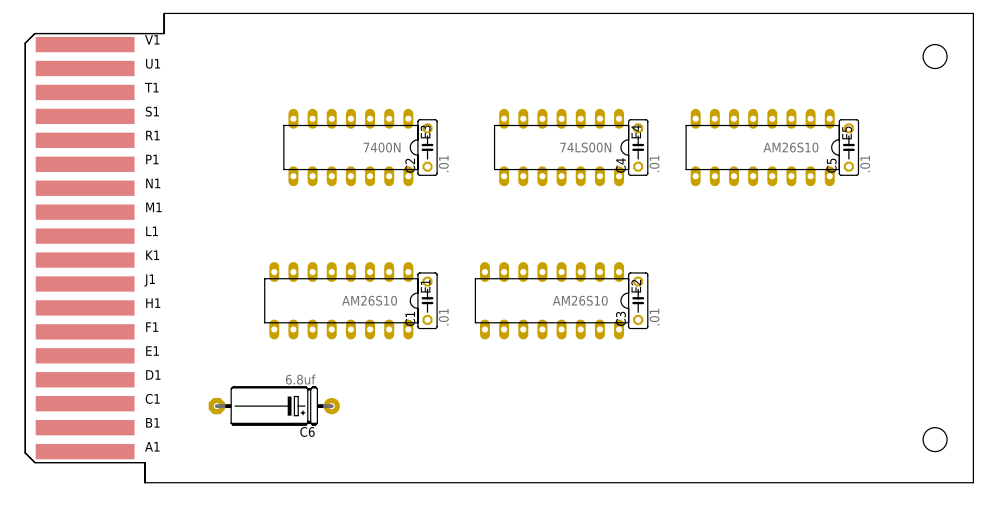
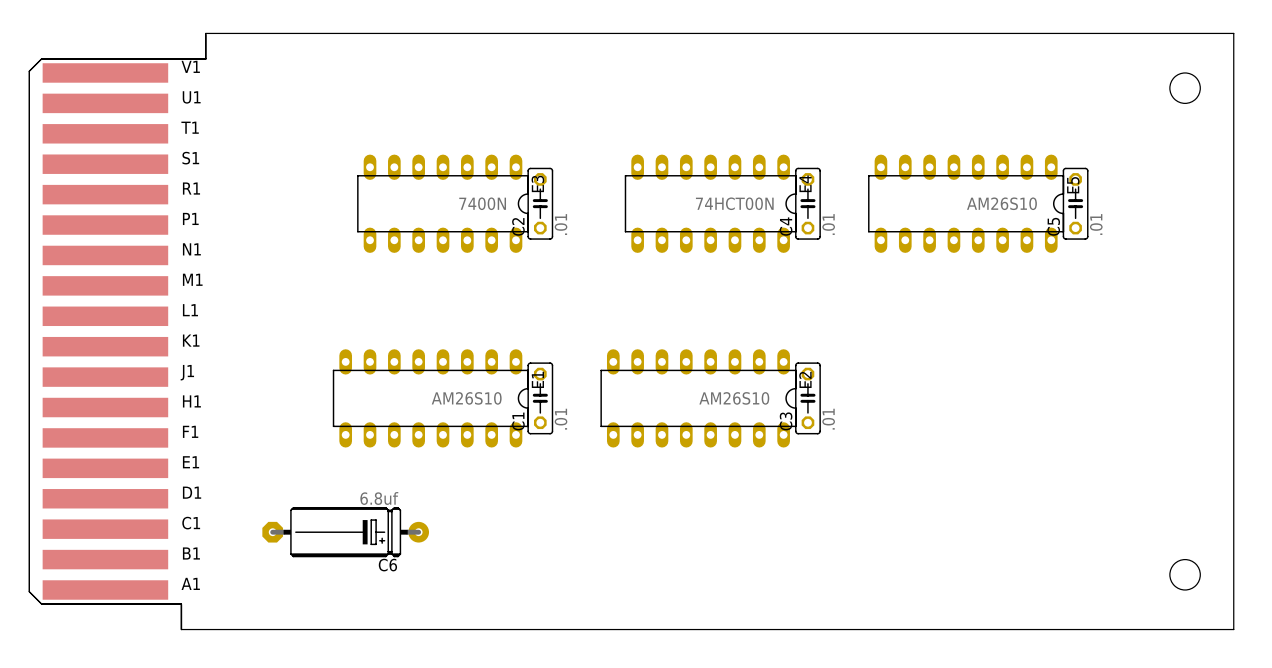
E4 value: 74LS00N (585, 147) -> 74HCT00N (734, 203)

